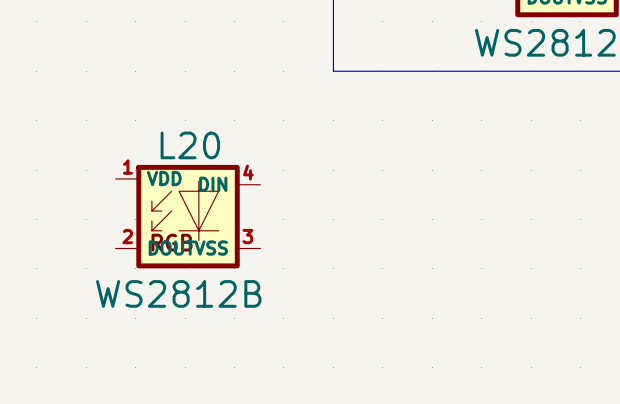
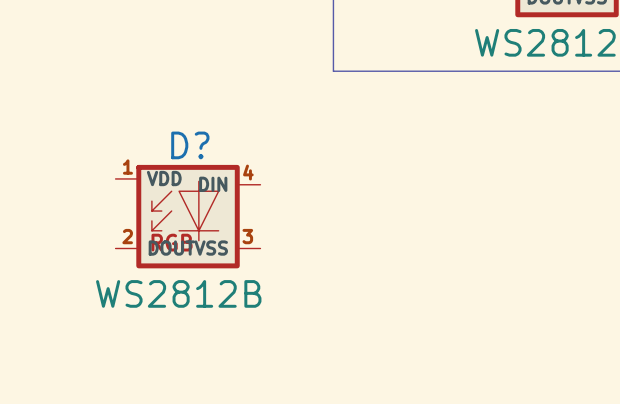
L20 name: L20 (190, 145) -> D? (190, 145)

